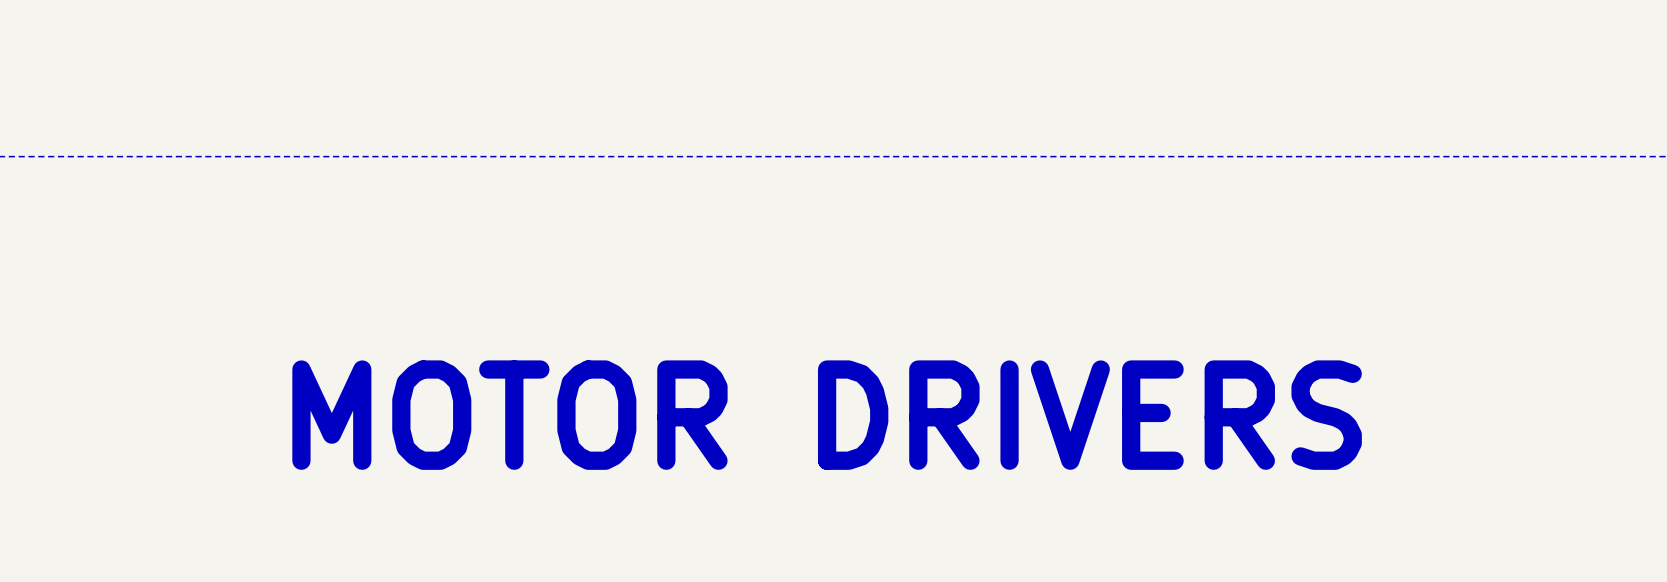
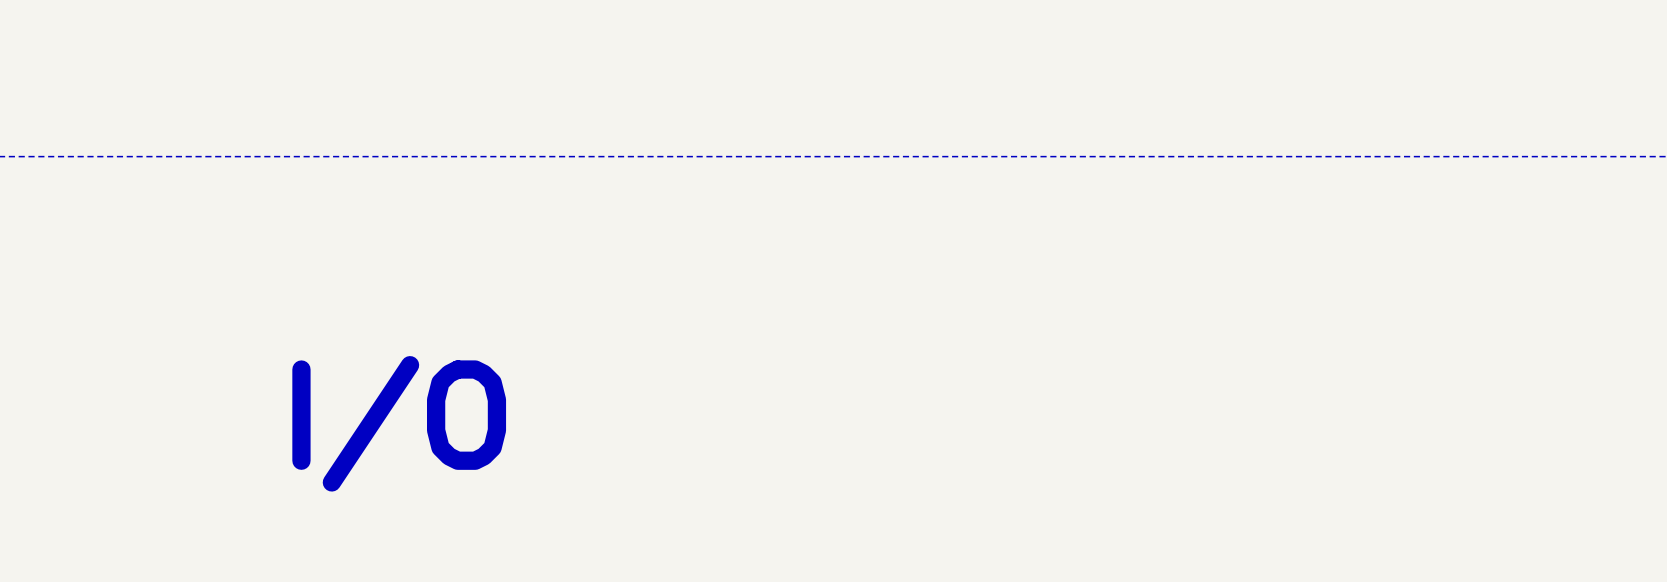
text: MOTOR DRIVERS (827, 415) -> I/O (399, 423)

